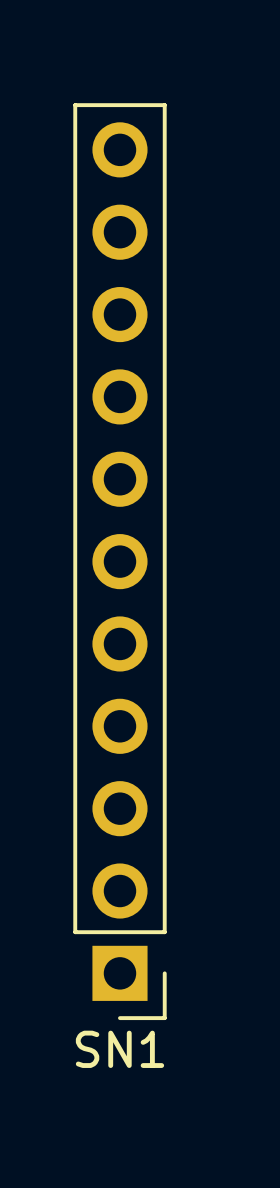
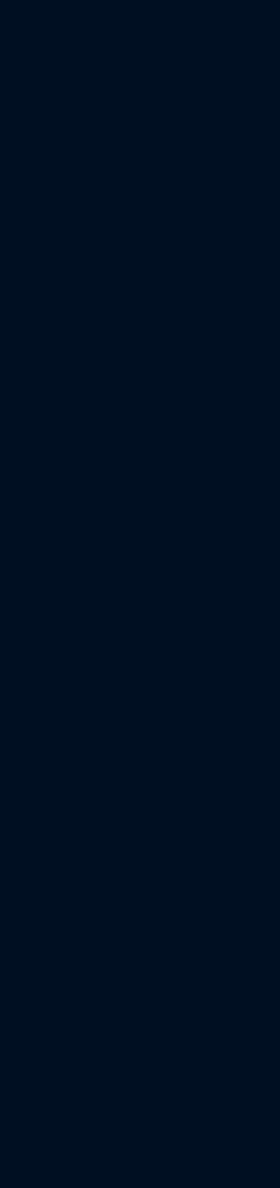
SN1: (119, 561) -> none

